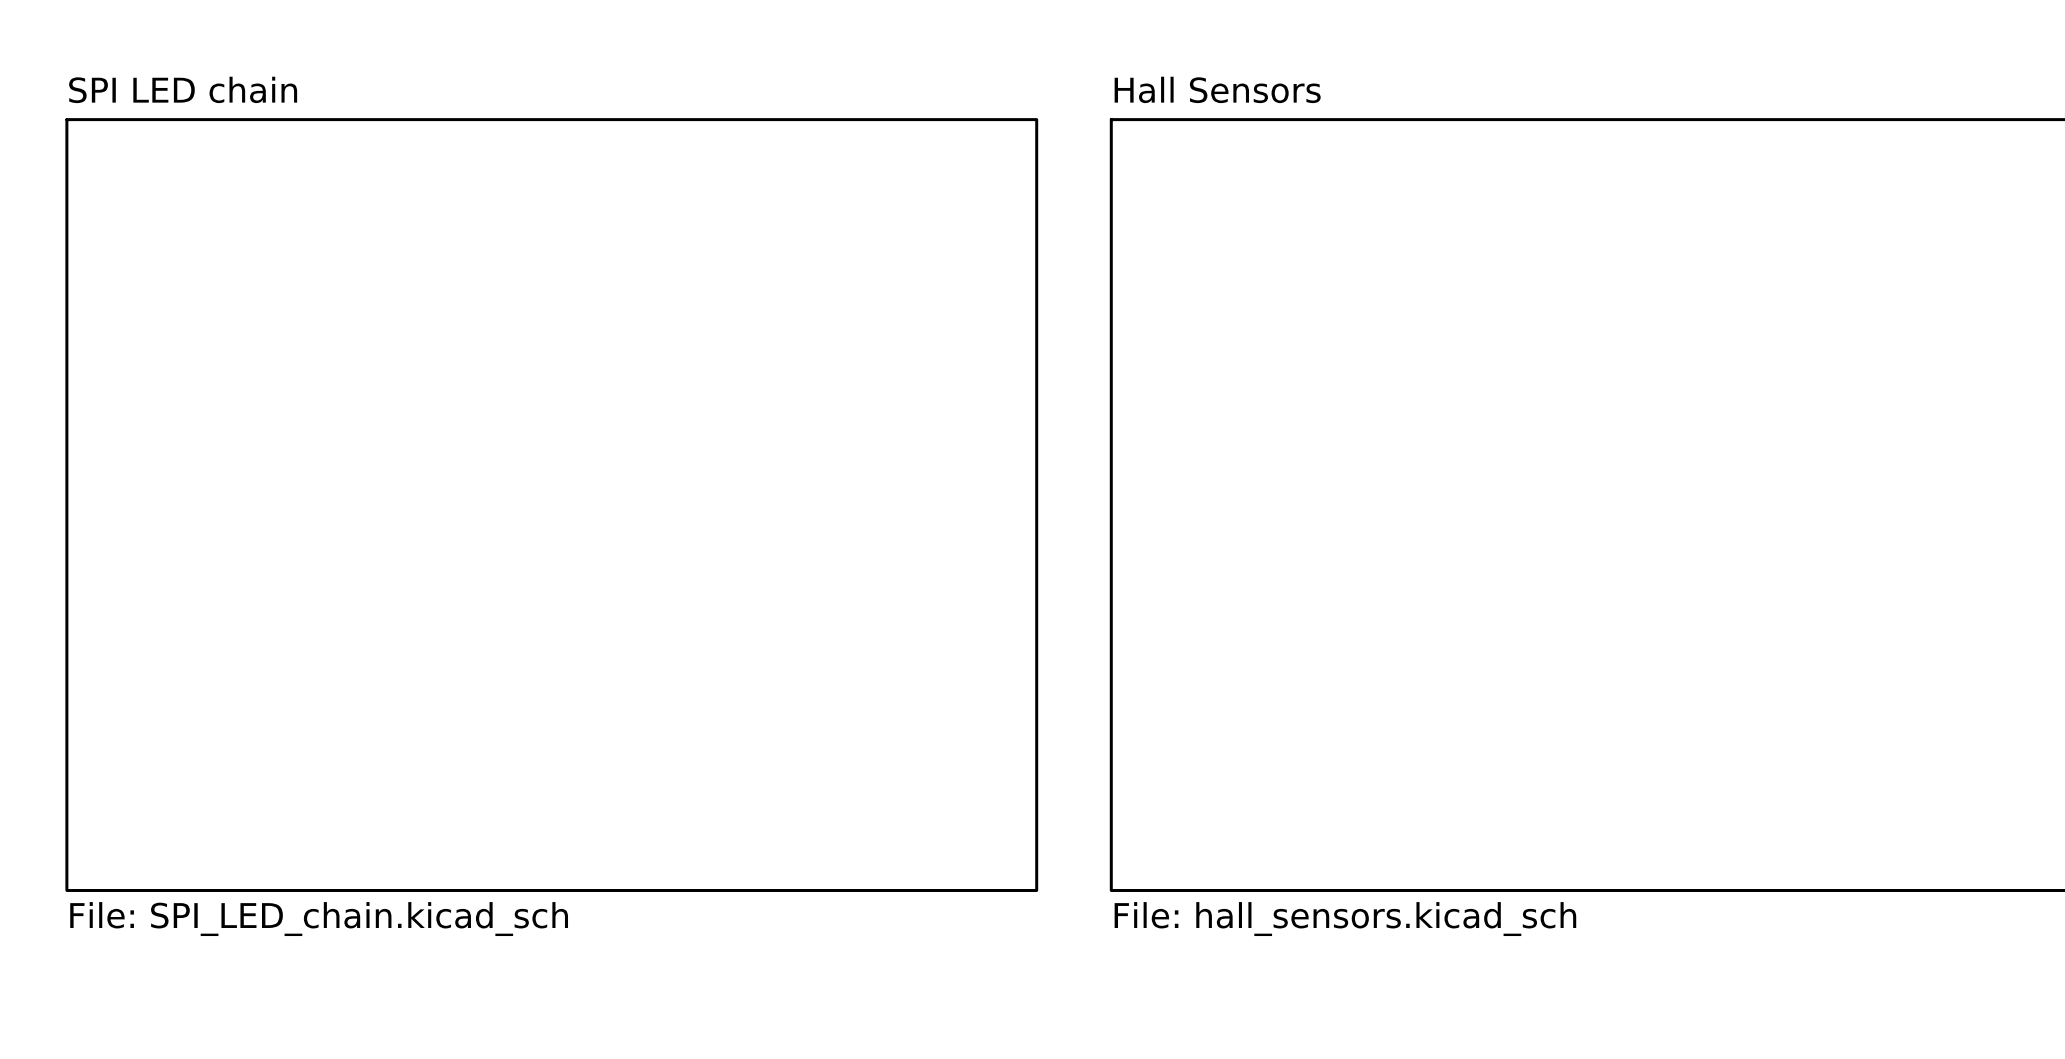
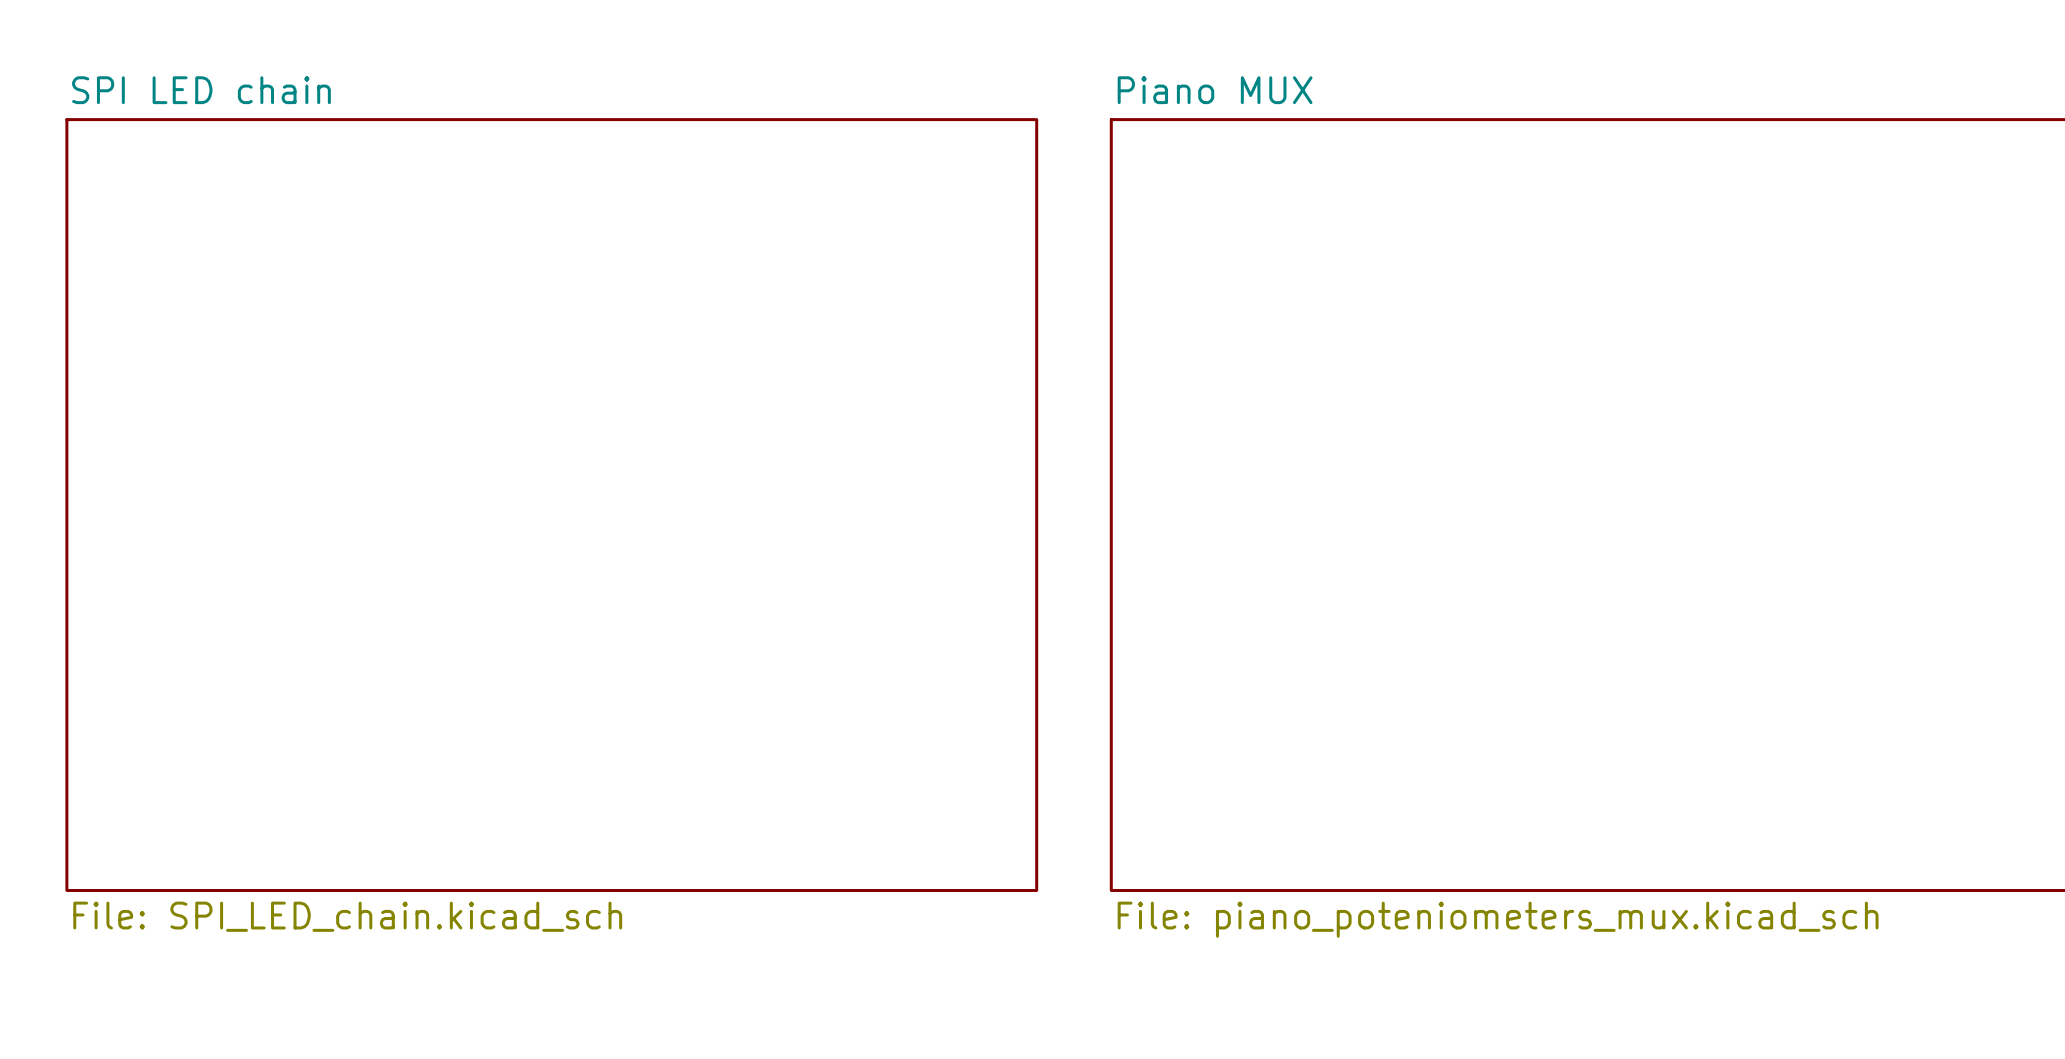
sheet Hall Sensors name: Hall Sensors (1217, 89) -> Piano MUX (1215, 90)
sheet Hall Sensors value: File: hall_sensors.kicad_sch (1345, 919) -> File: piano_poteniometers_mux.kicad_sch (1498, 919)

